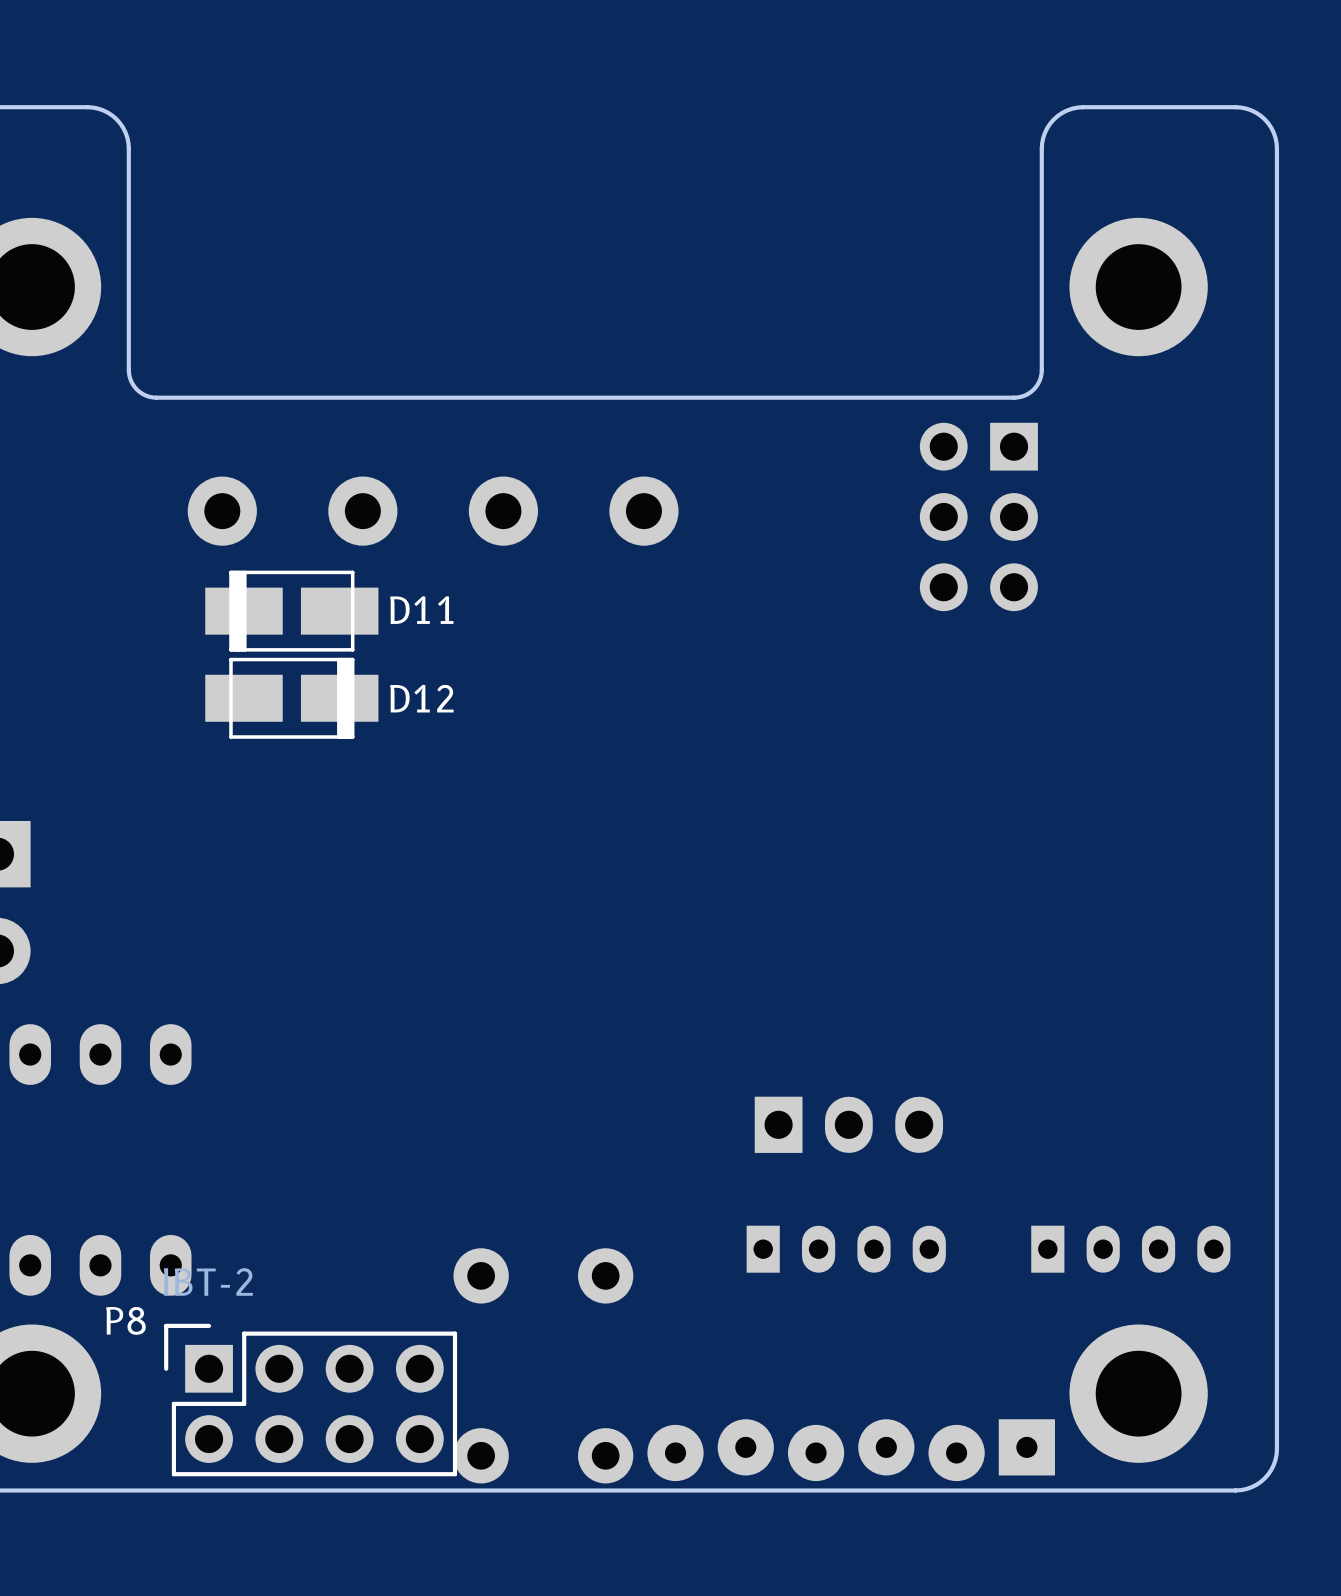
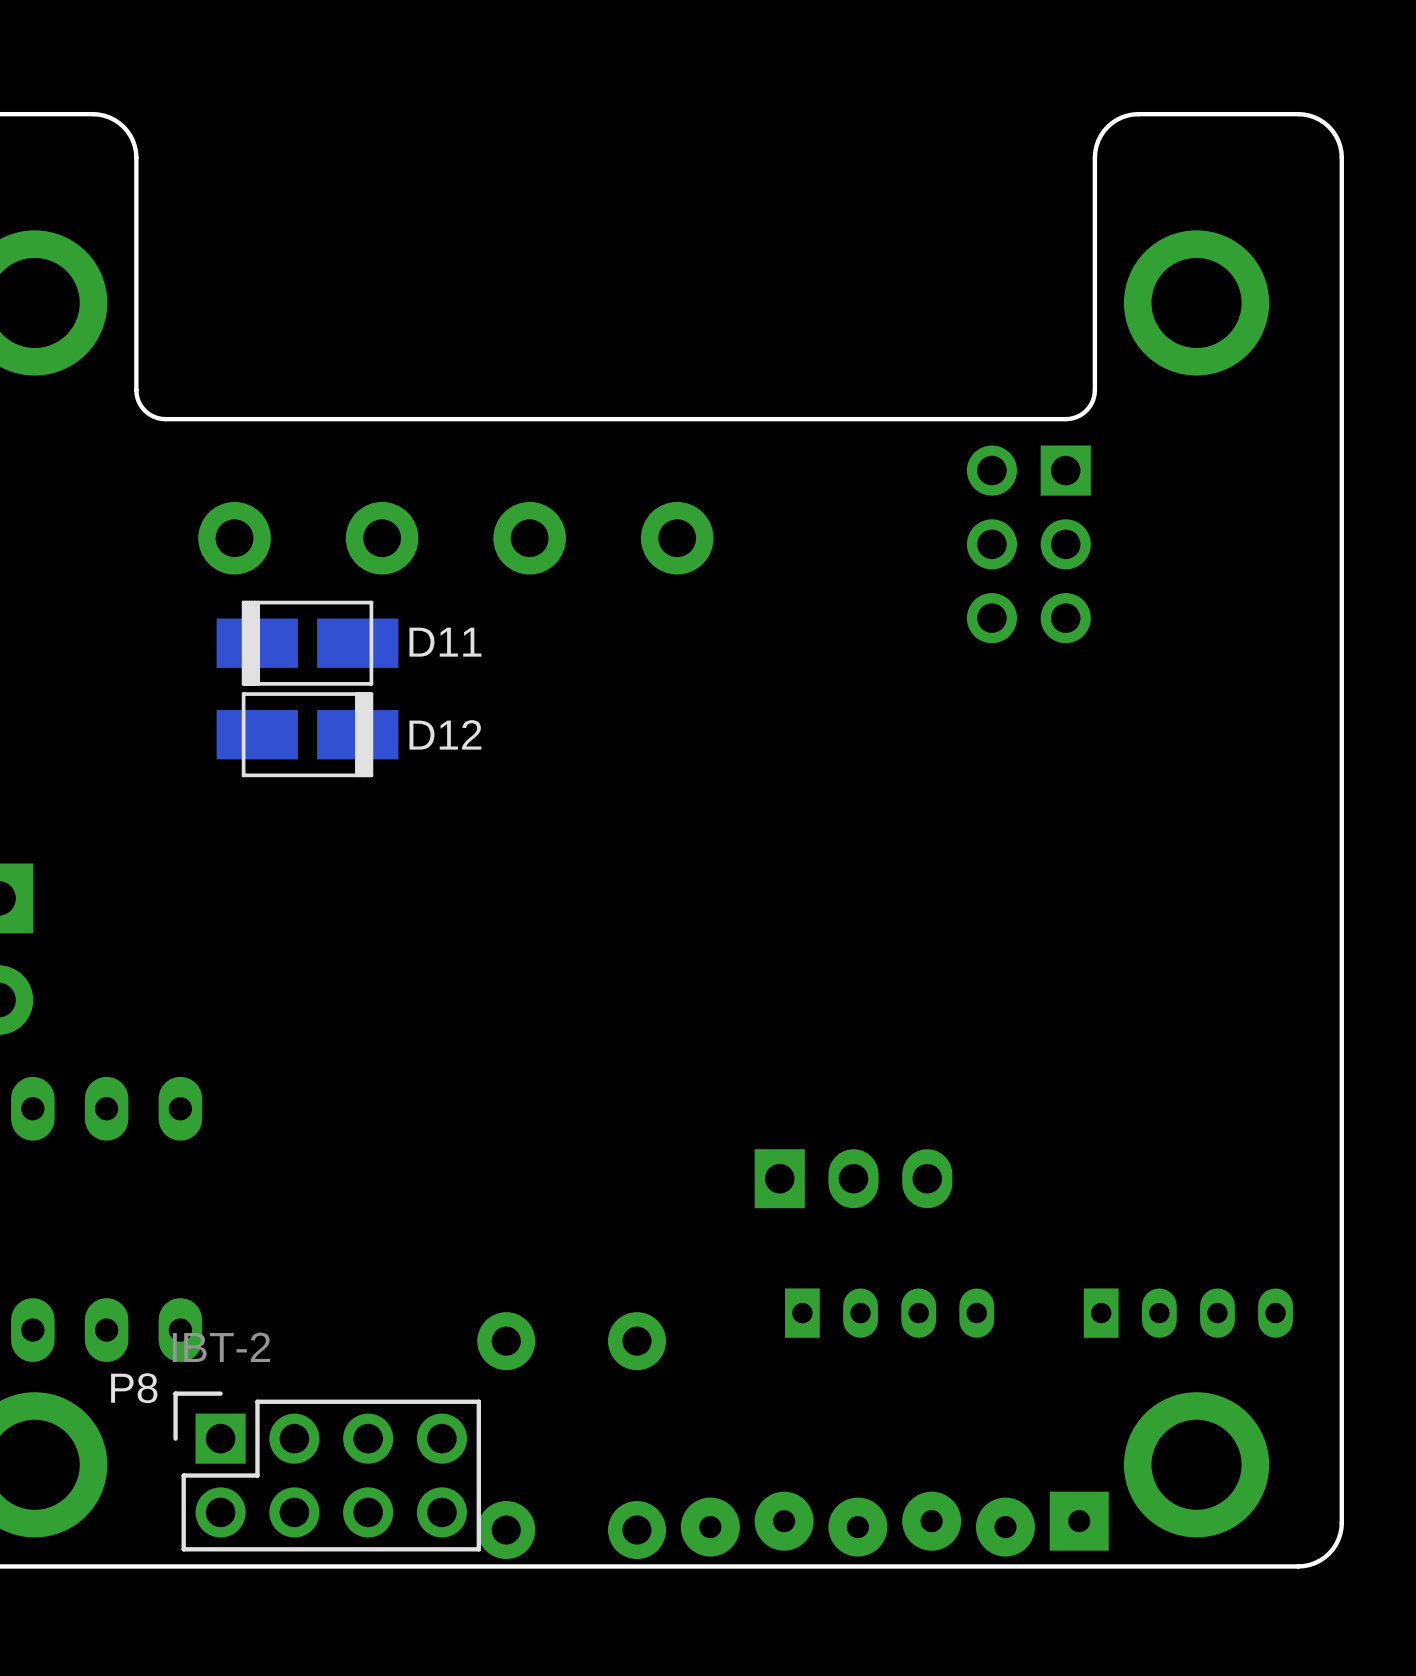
part position: (848, 1124) -> (853, 1178)

